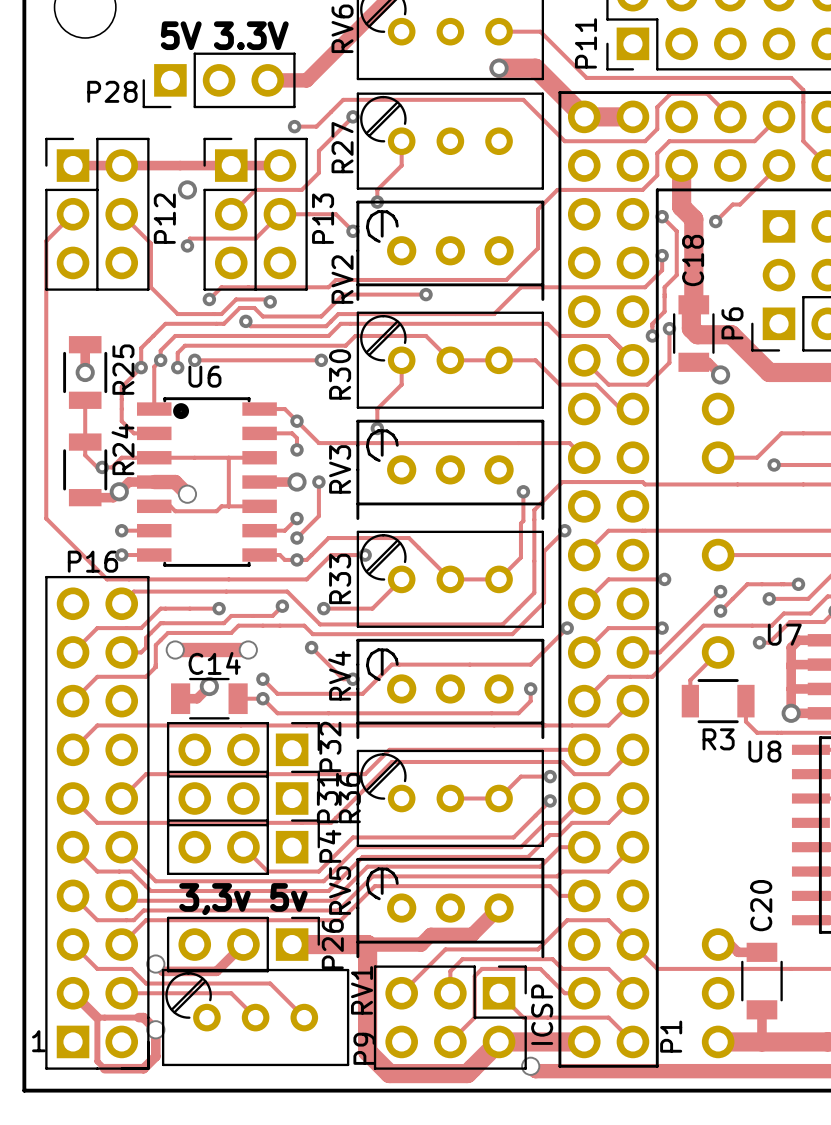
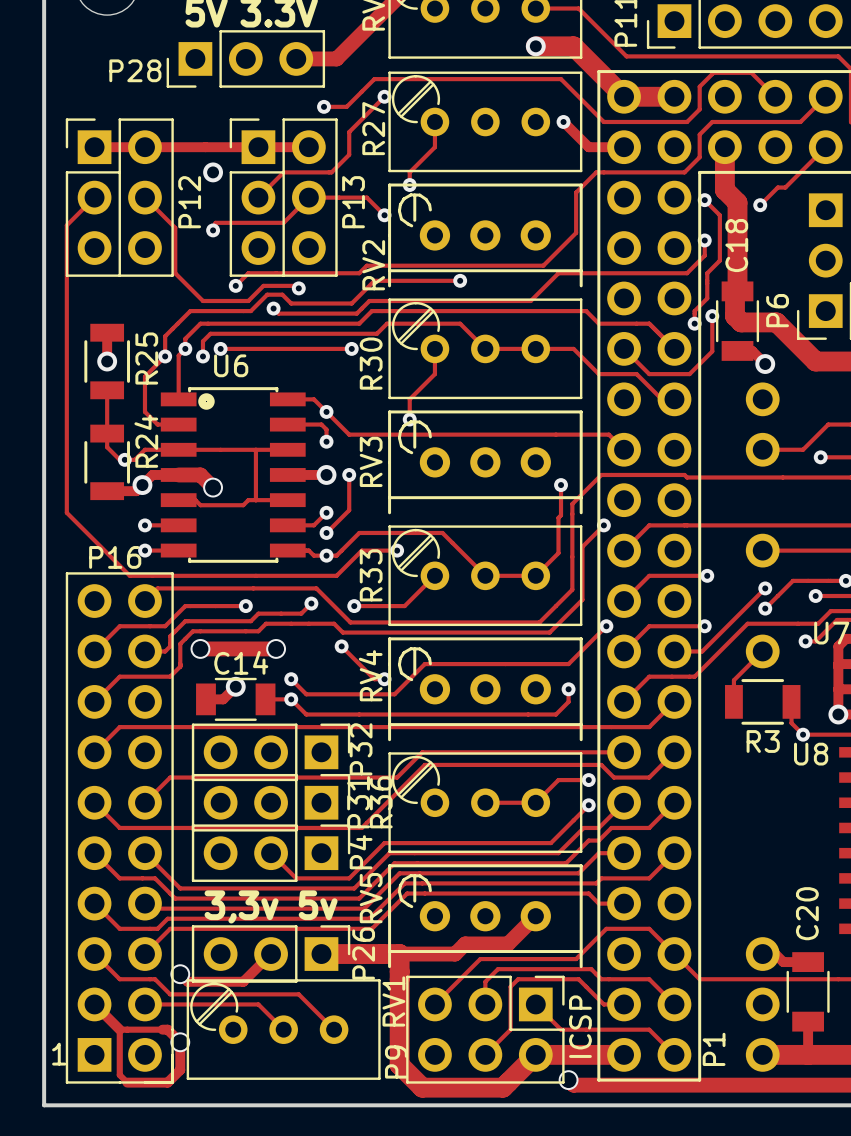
track: none -> (563, 121) (588, 147) (624, 147)
via: none -> (563, 121)
via: none -> (803, 734)

